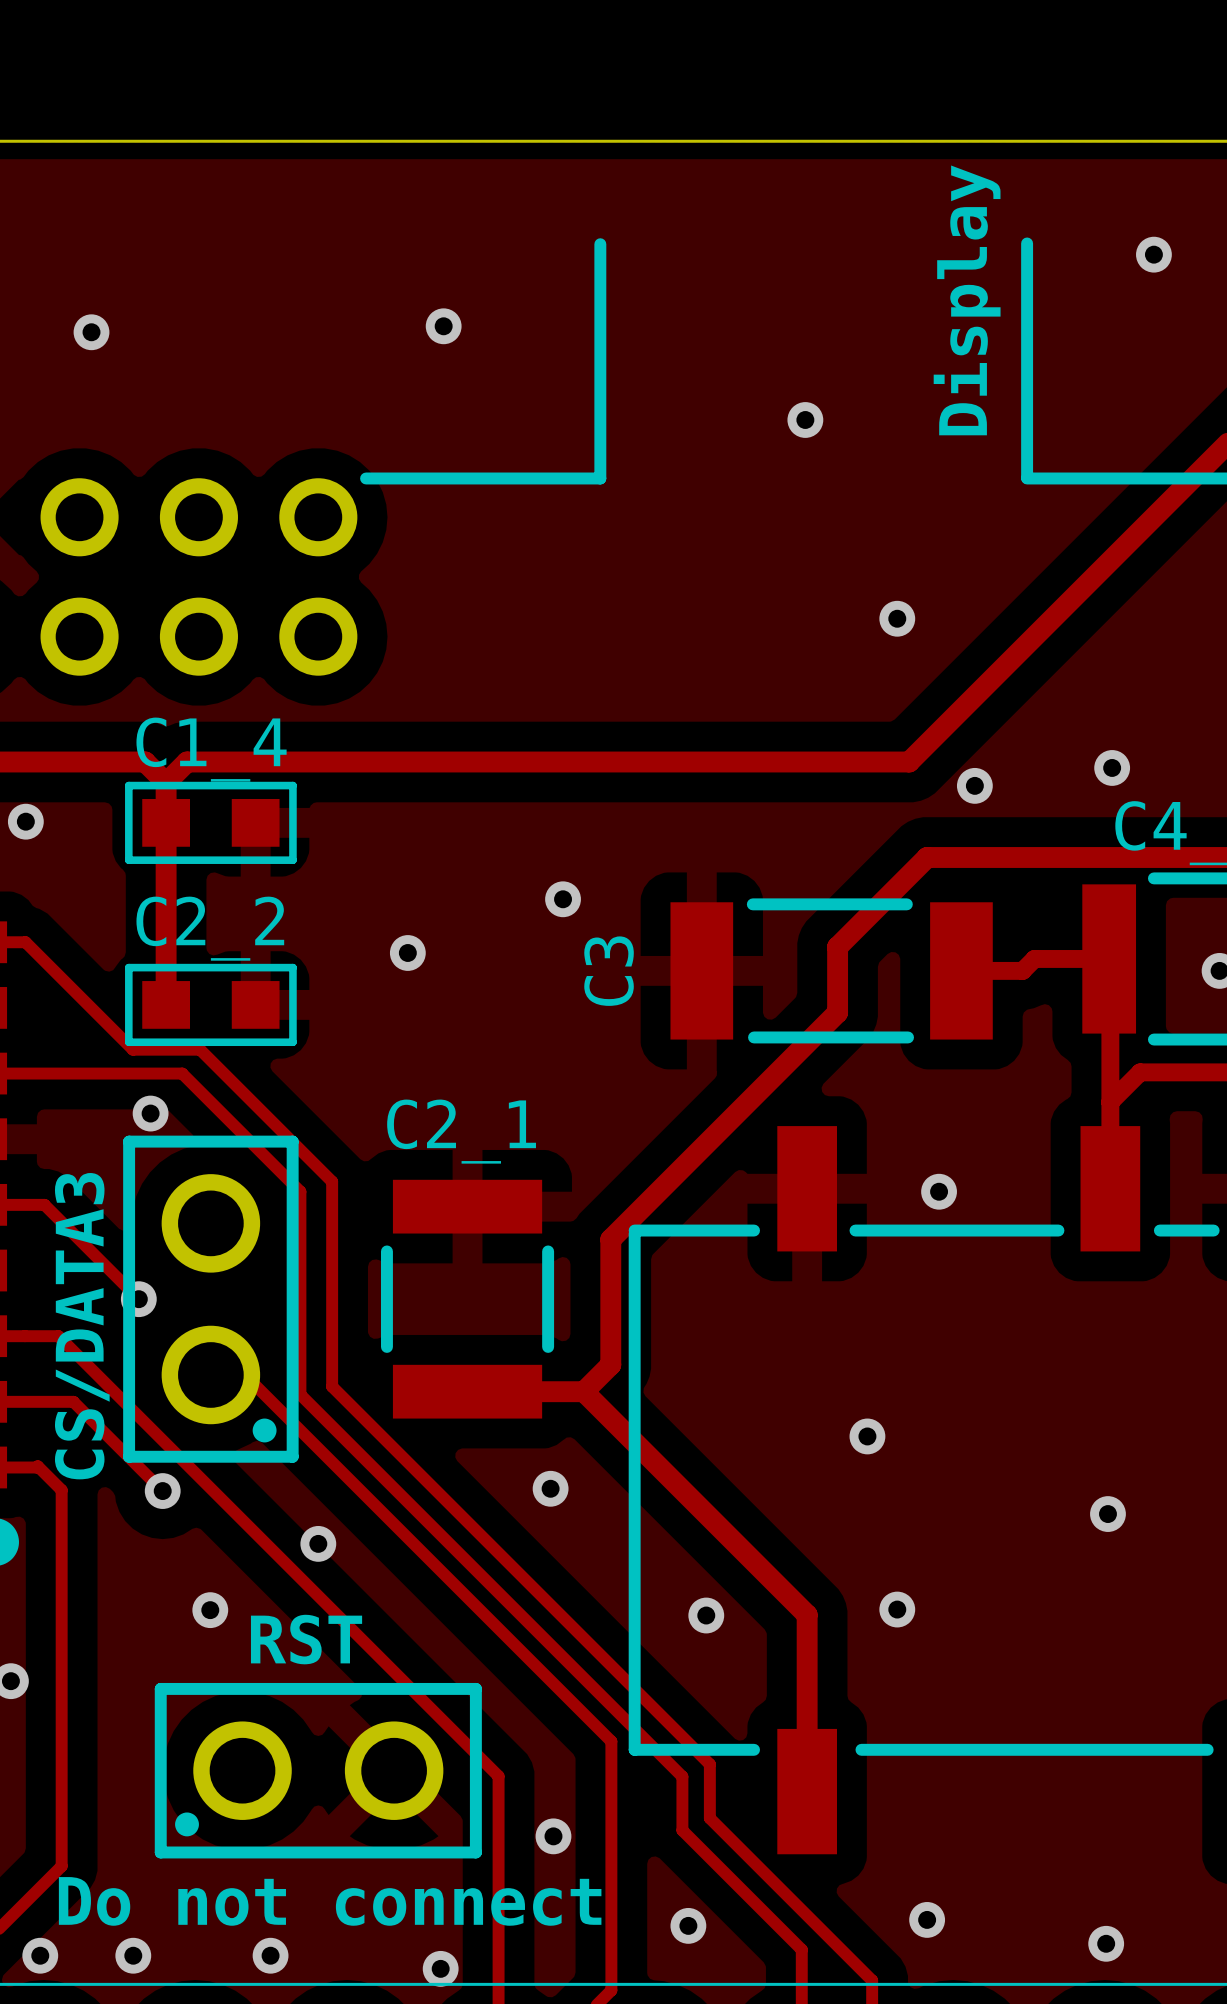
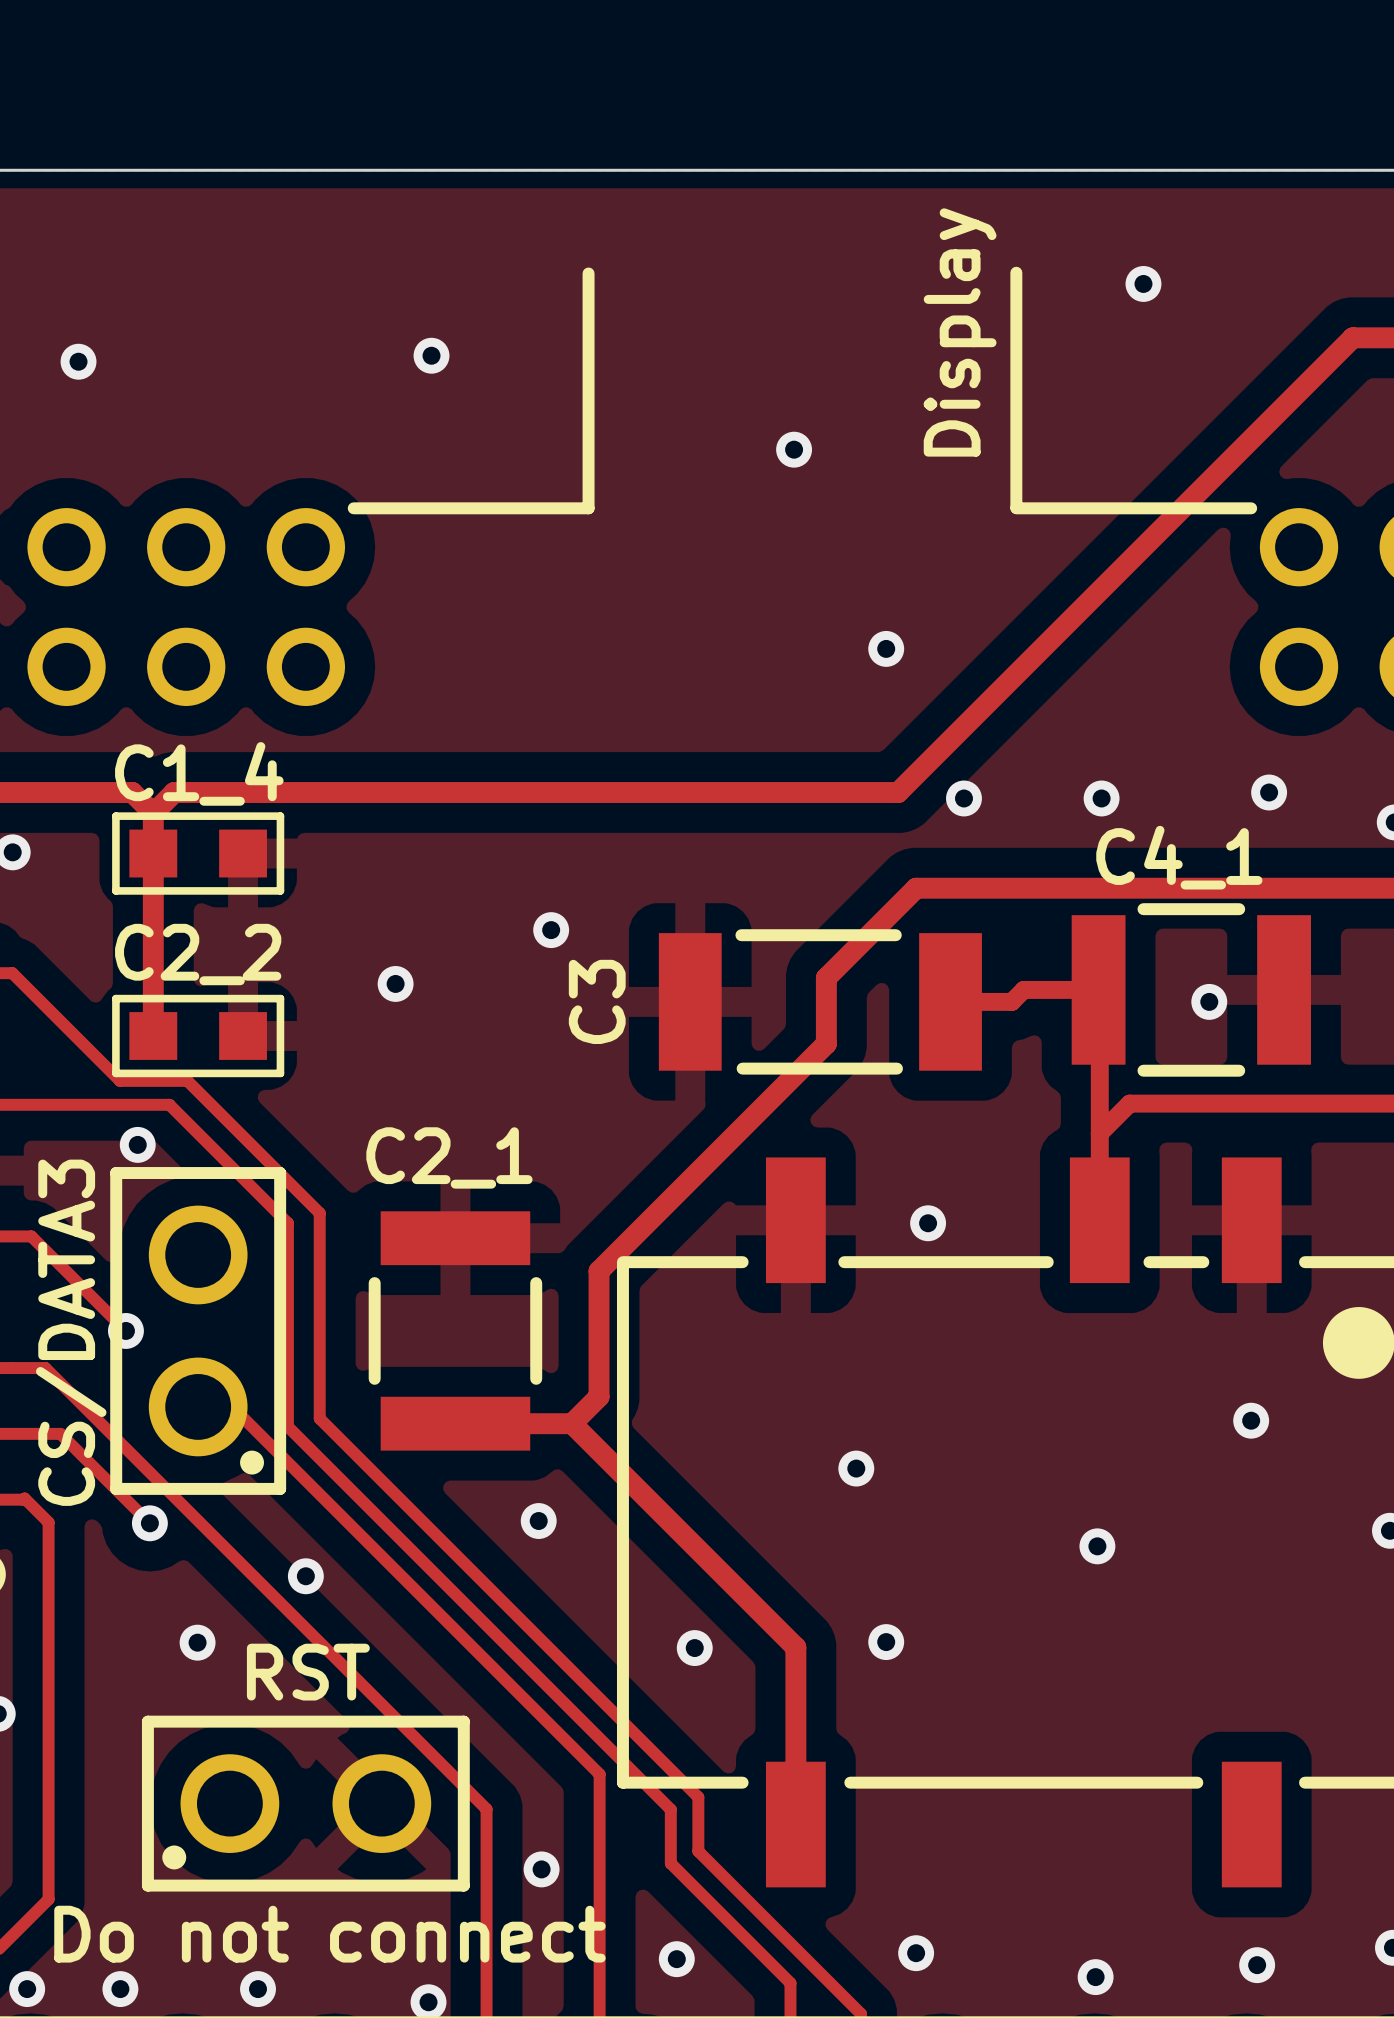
via position: (974, 785) -> (963, 798)

